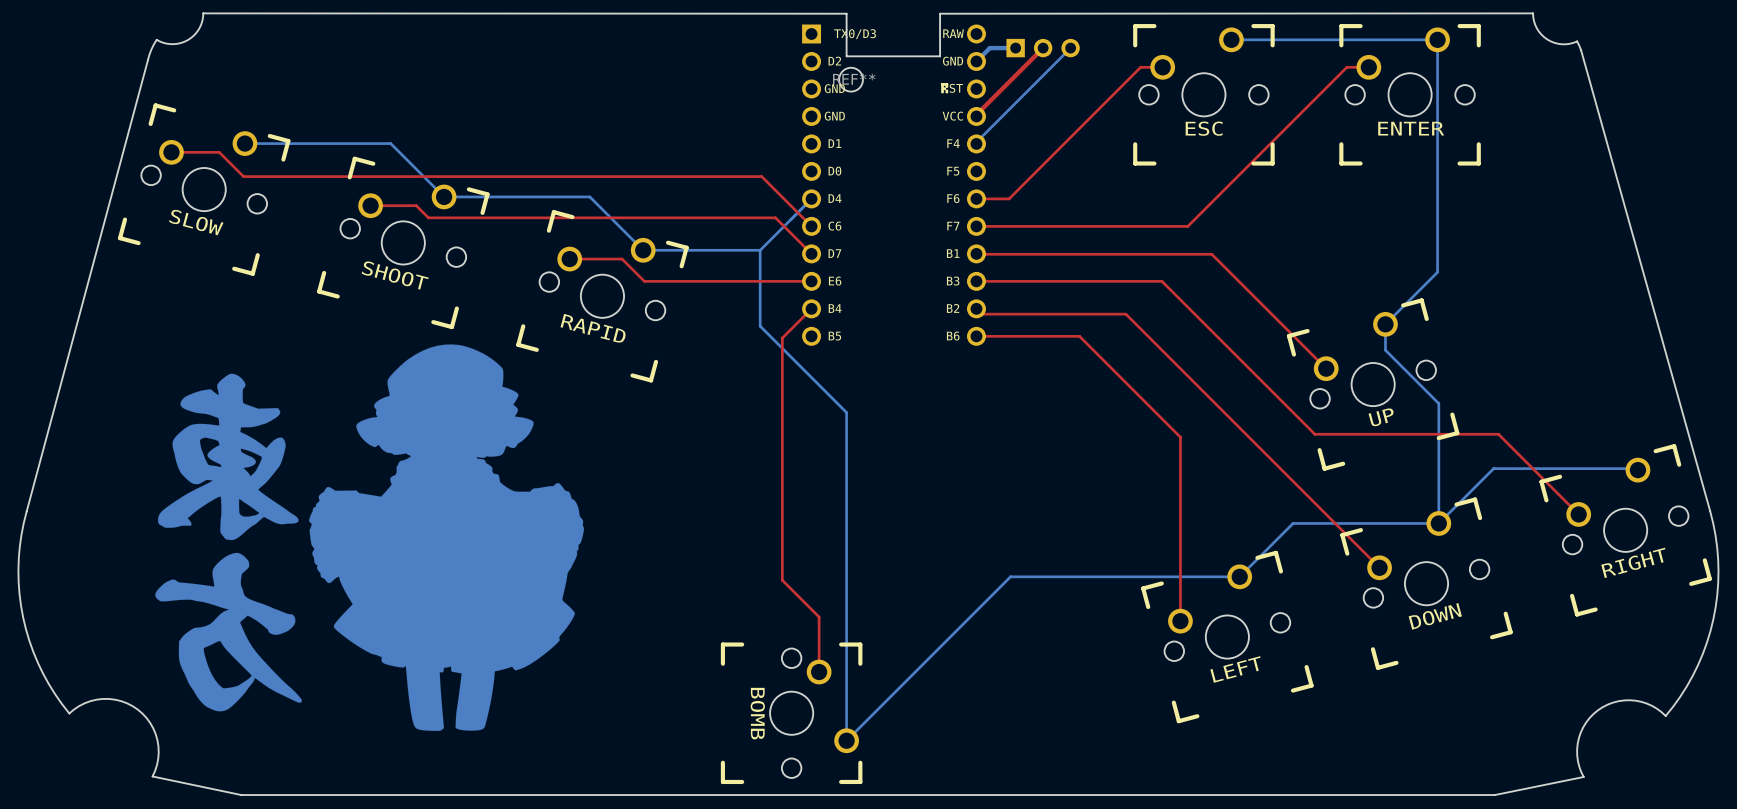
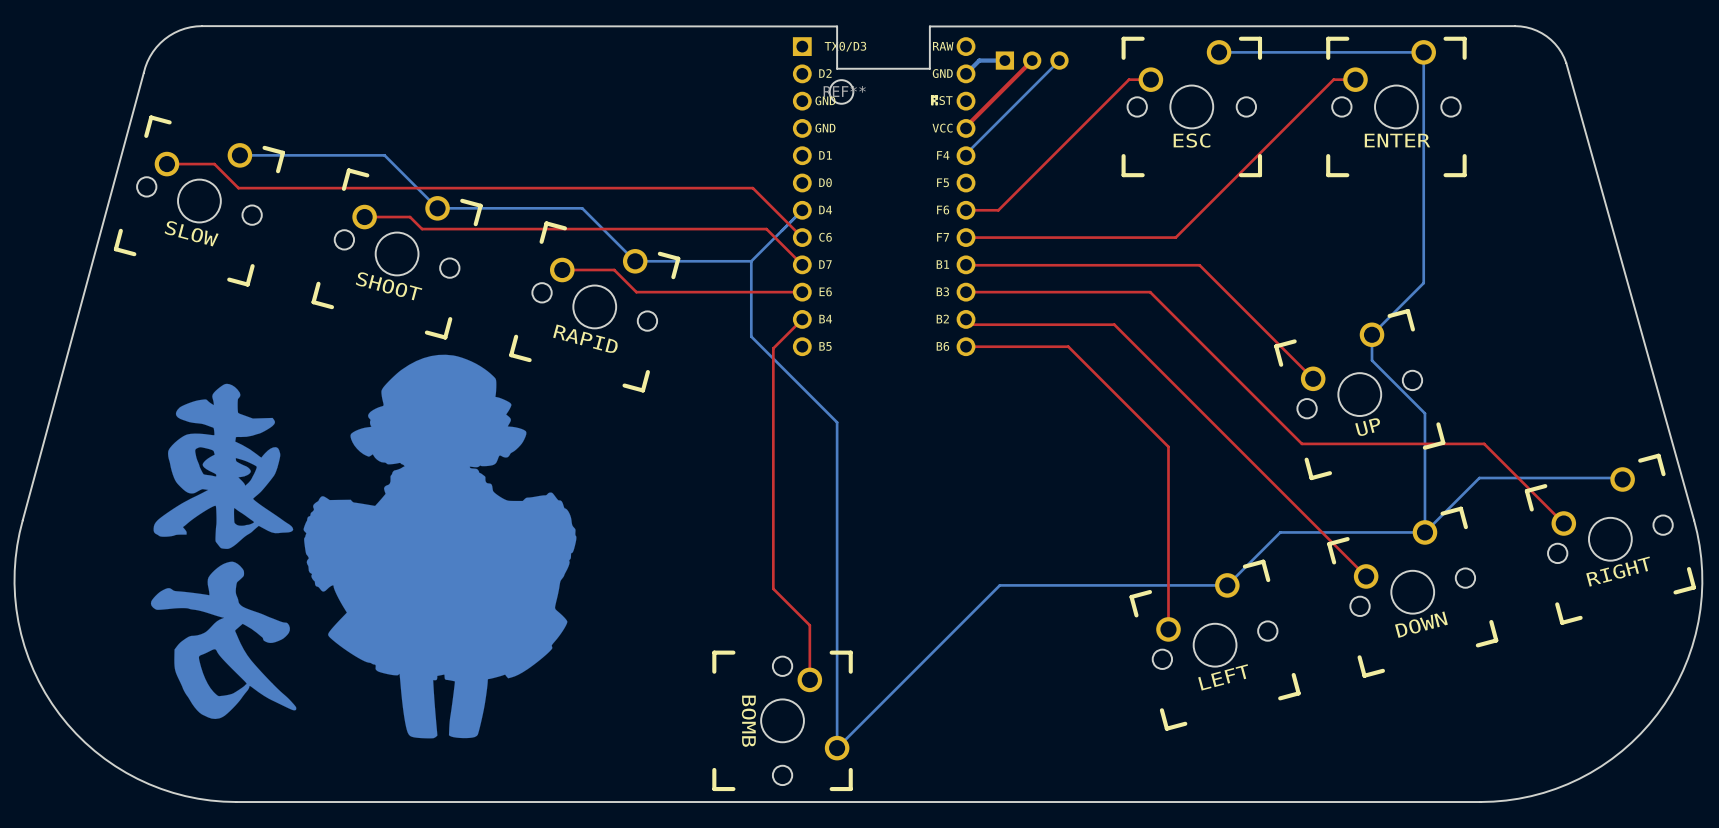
board edge: (206, 13) (203, 13) (199, 27) (190, 38) (173, 44) (156, 39) (149, 54) (23, 523) (18, 558) (18, 582) (23, 617) (33, 652) (48, 684) (69, 713) (79, 706) (96, 699) (109, 698) (127, 703) (146, 718) (155, 734) (158, 752) (152, 776) (241, 795) -> (202, 26) (185, 28) (169, 35) (152, 51) (145, 67) (19, 532) (15, 558) (15, 596) (21, 634) (33, 670) (52, 703) (85, 742) (115, 766) (149, 784) (185, 796) (236, 802)
board edge: (1529, 13) (1533, 13) (1536, 28) (1547, 39) (1562, 44) (1577, 41) (1581, 50) (1710, 511) (1717, 547) (1718, 583) (1713, 619) (1702, 653) (1686, 686) (1665, 716) (1656, 708) (1641, 701) (1624, 700) (1607, 704) (1589, 718) (1578, 738) (1577, 760) (1583, 776) (1494, 795) -> (1515, 26) (1531, 28) (1546, 36) (1558, 48) (1566, 63) (1694, 520) (1701, 558) (1701, 596) (1695, 634) (1677, 681) (1657, 714) (1631, 742) (1601, 766) (1567, 784) (1531, 796) (1480, 802)

